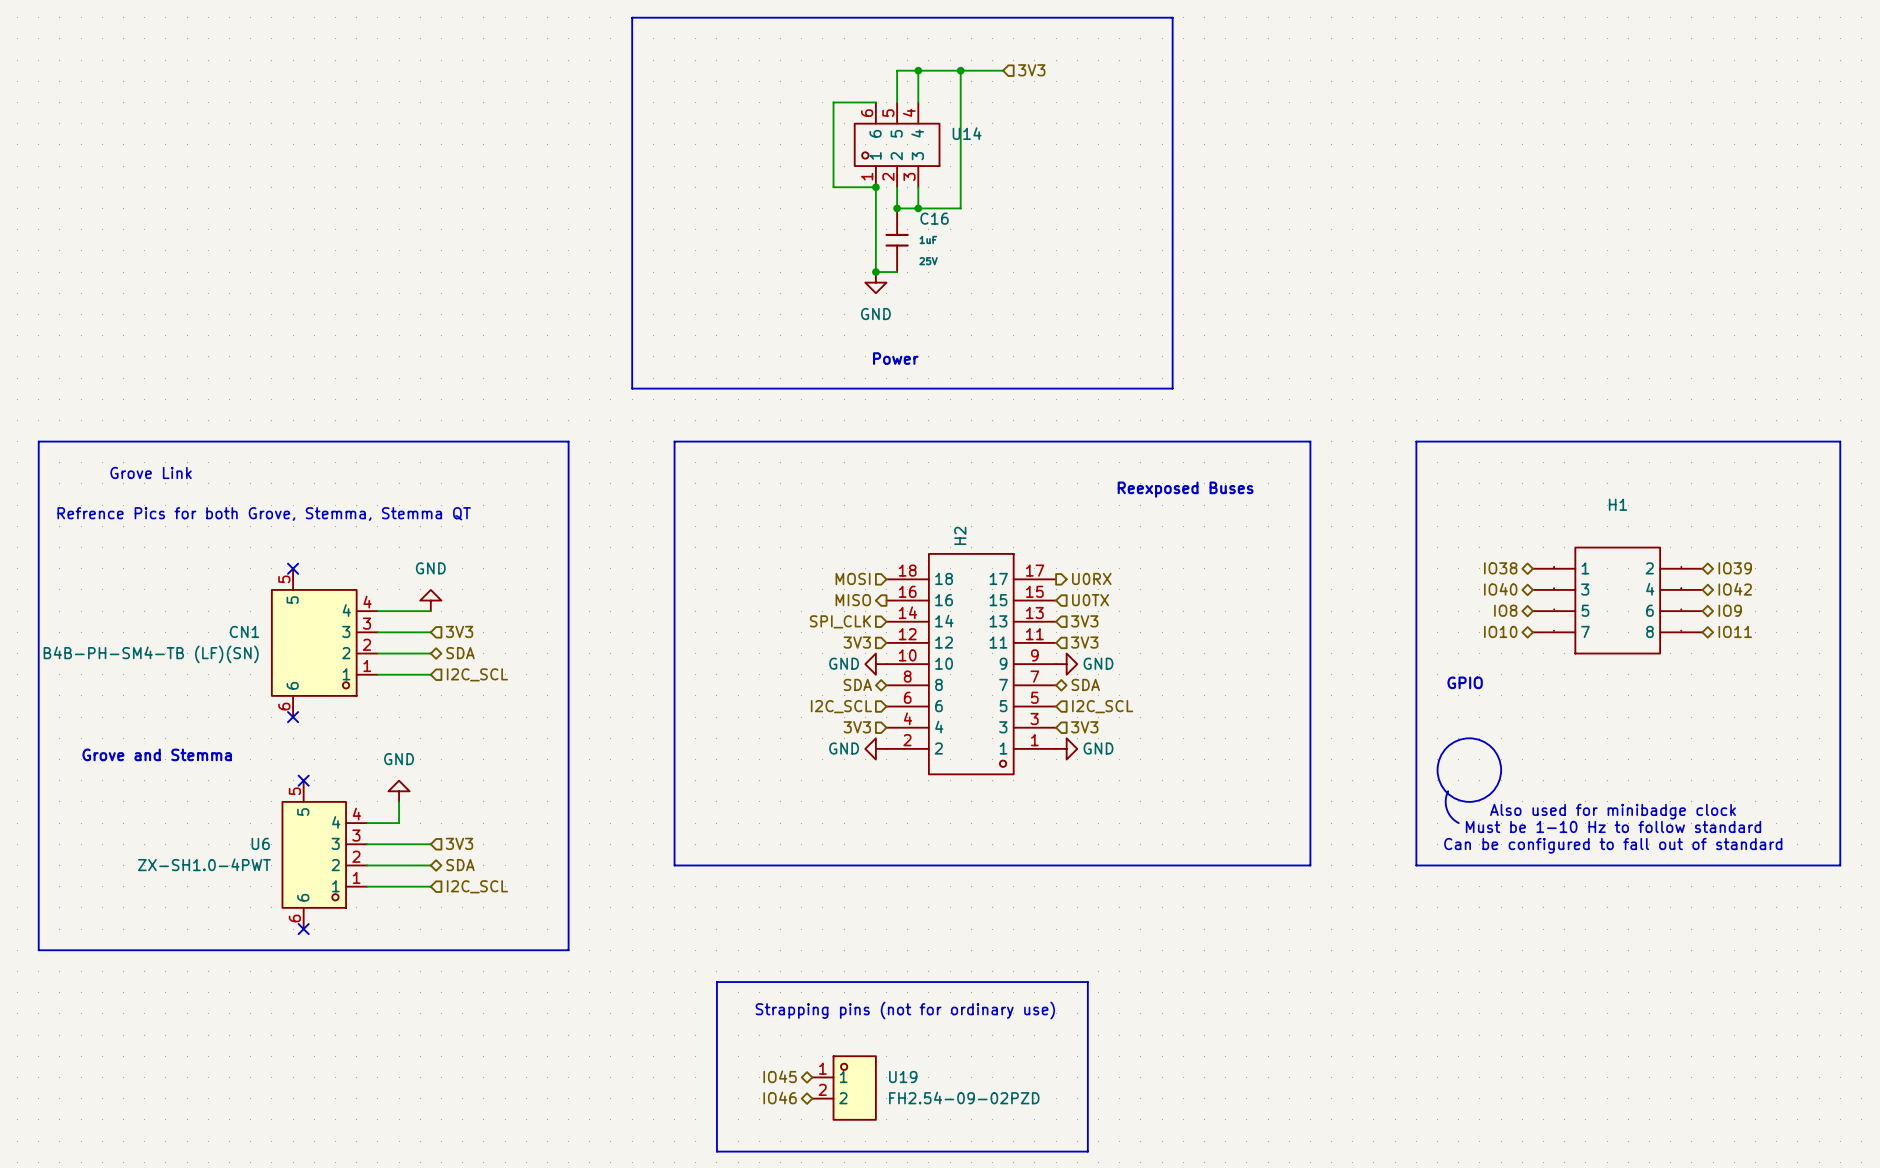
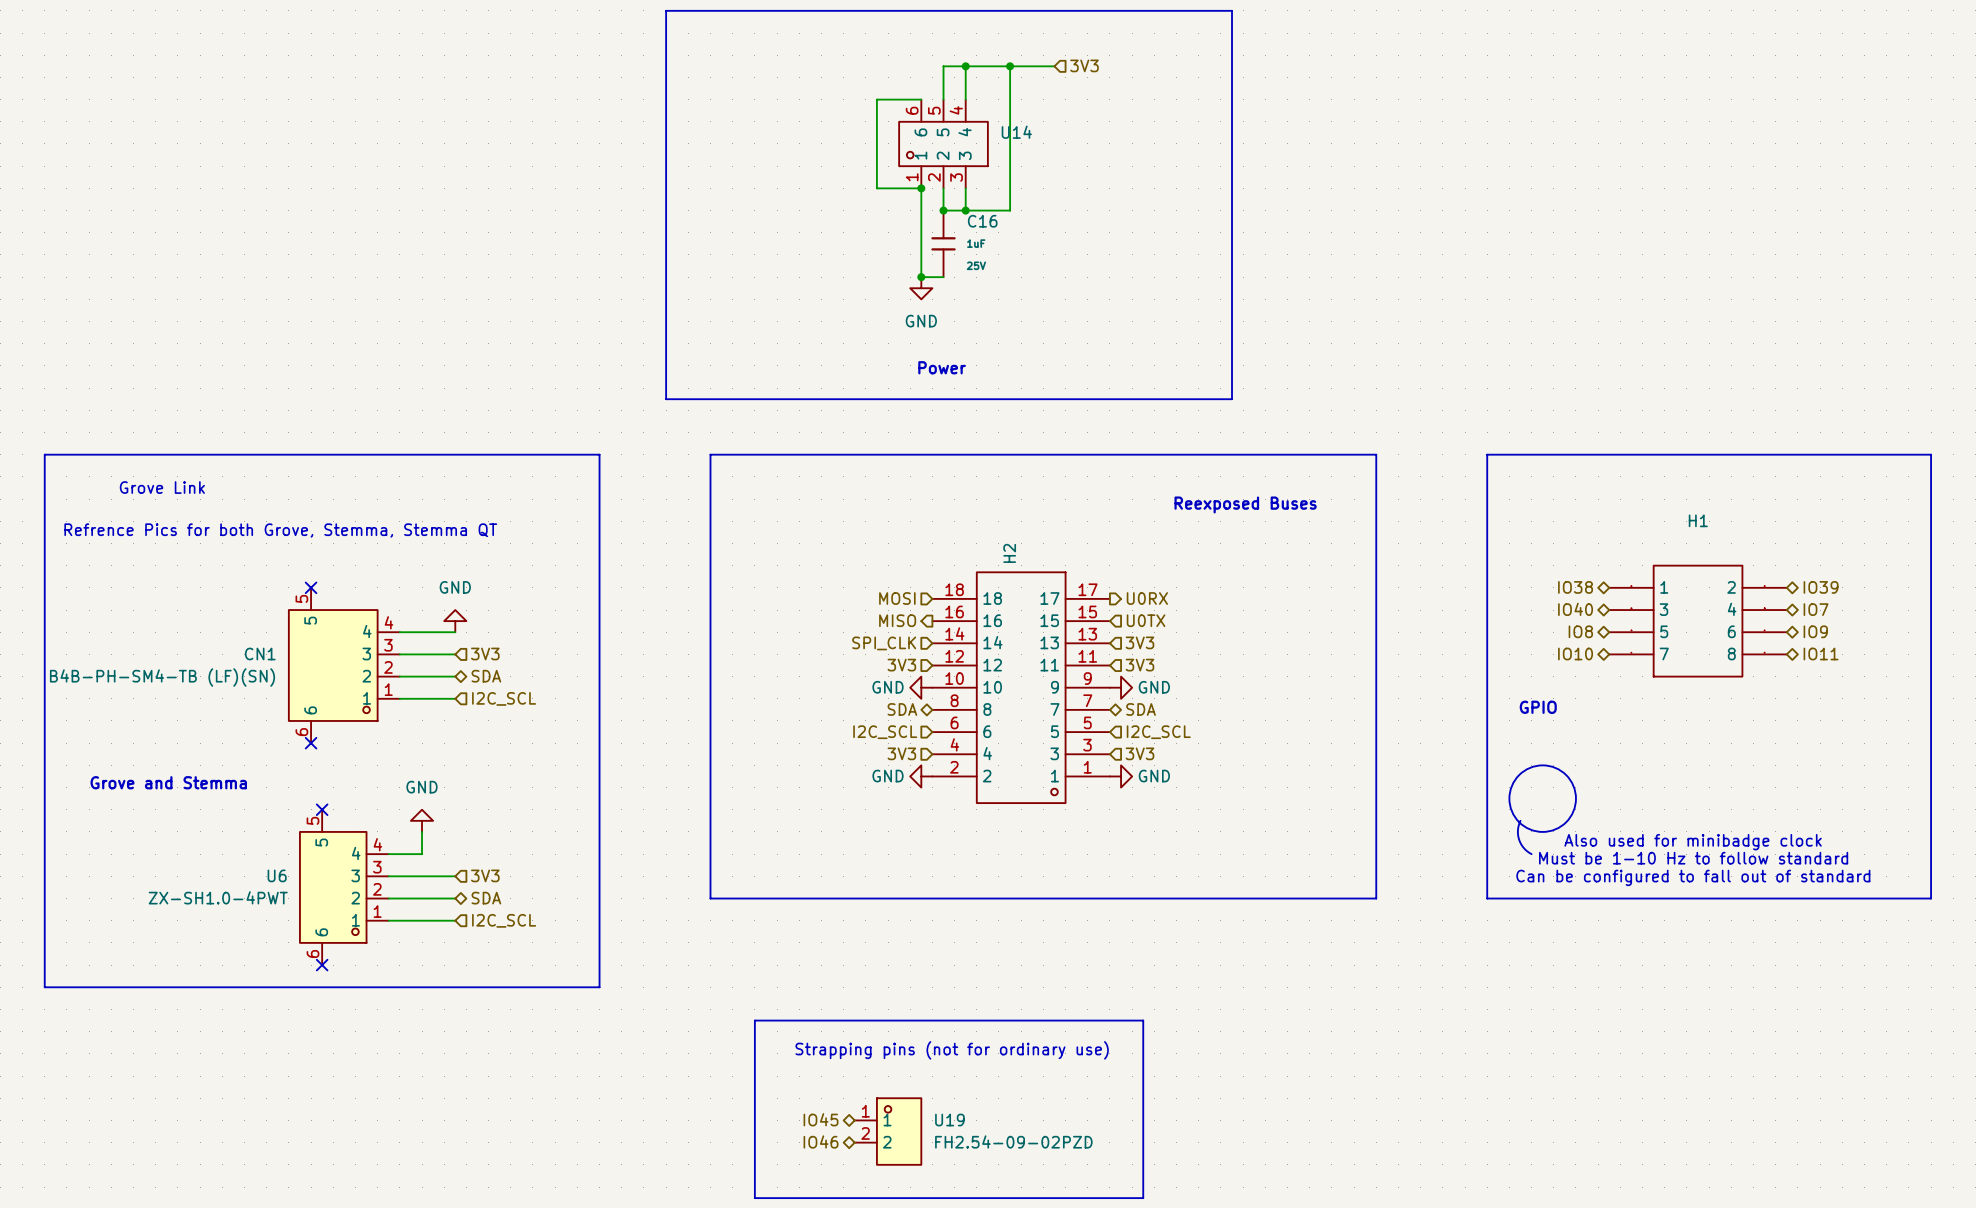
hierarchical label: IO42 (1735, 589) -> IO7 (1816, 609)

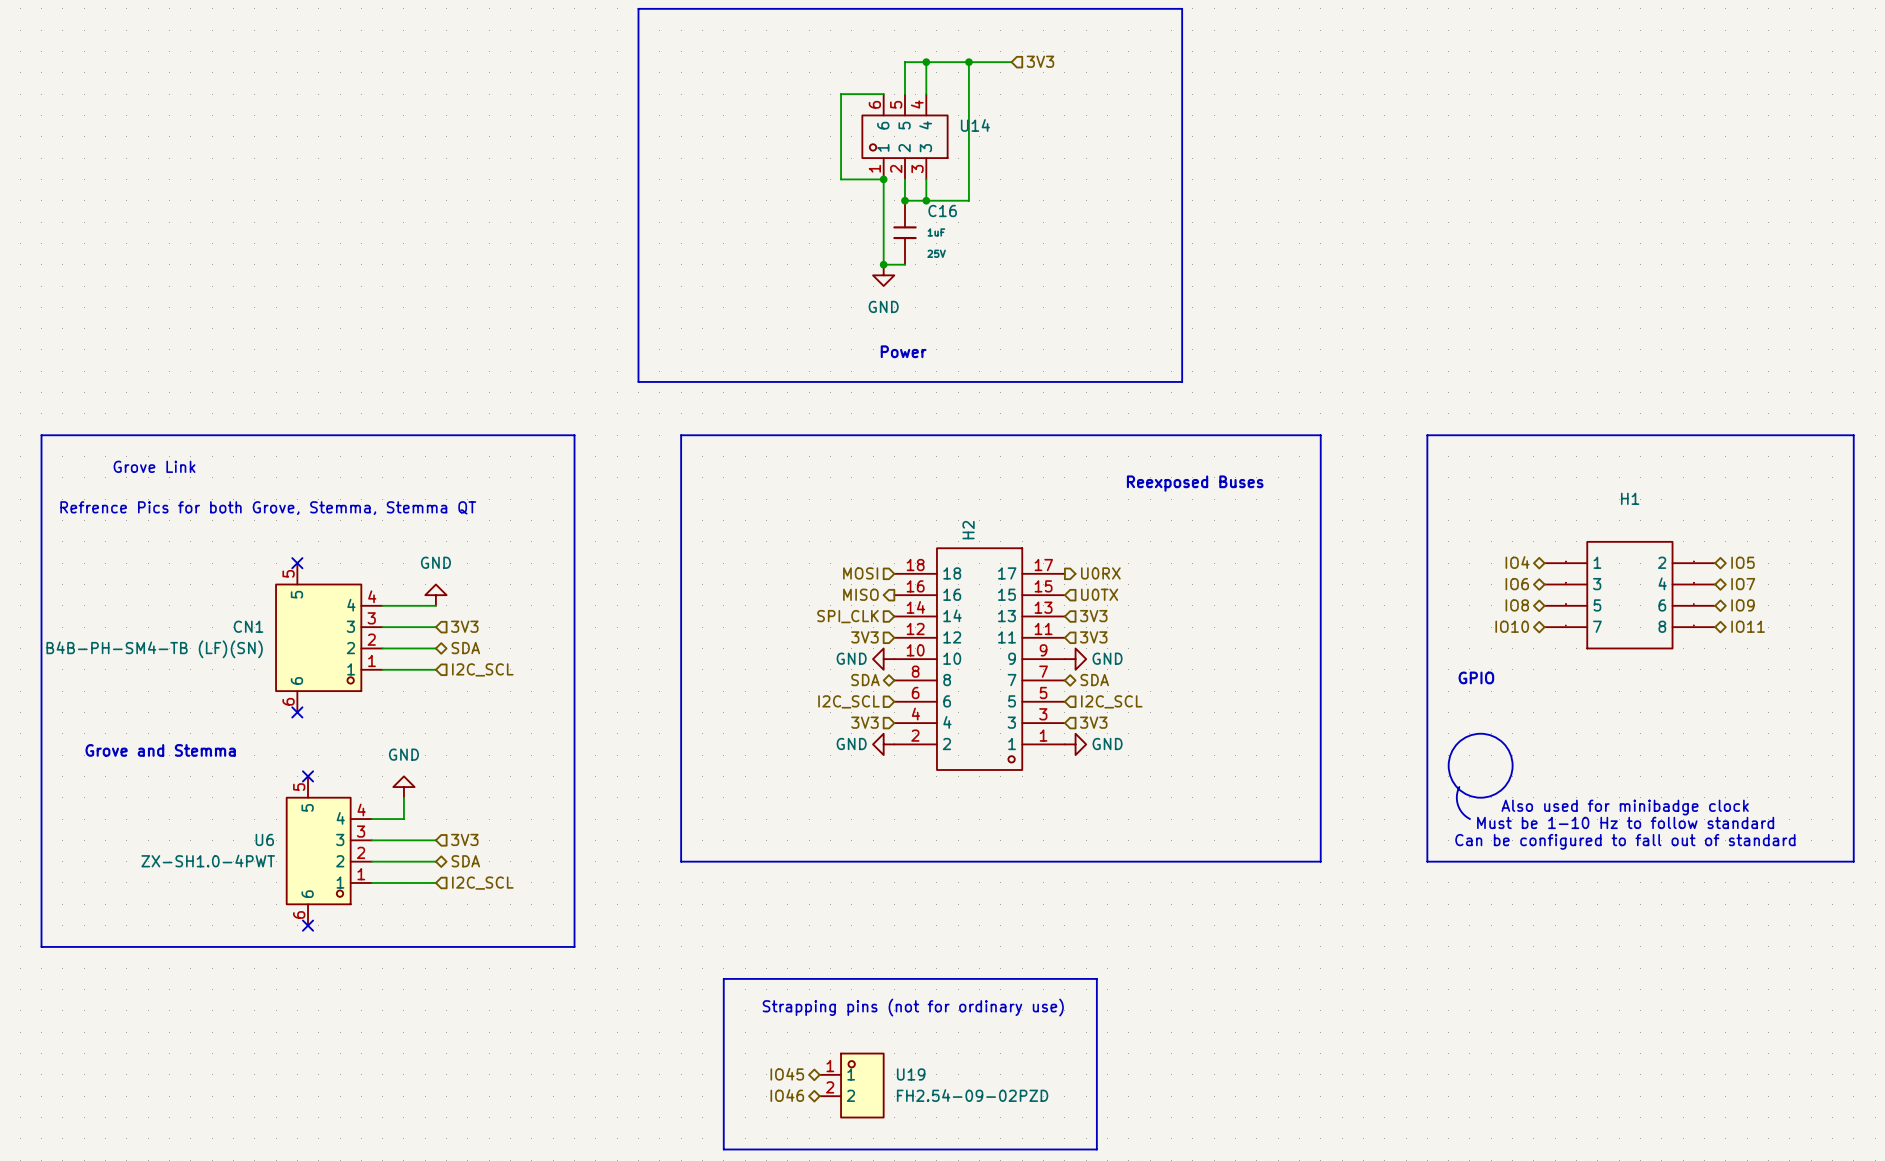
hierarchical label: IO38 (1575, 587) -> IO4 (1517, 562)
hierarchical label: IO39 (1821, 587) -> IO5 (1743, 562)
hierarchical label: IO40 (1575, 609) -> IO6 (1517, 584)

